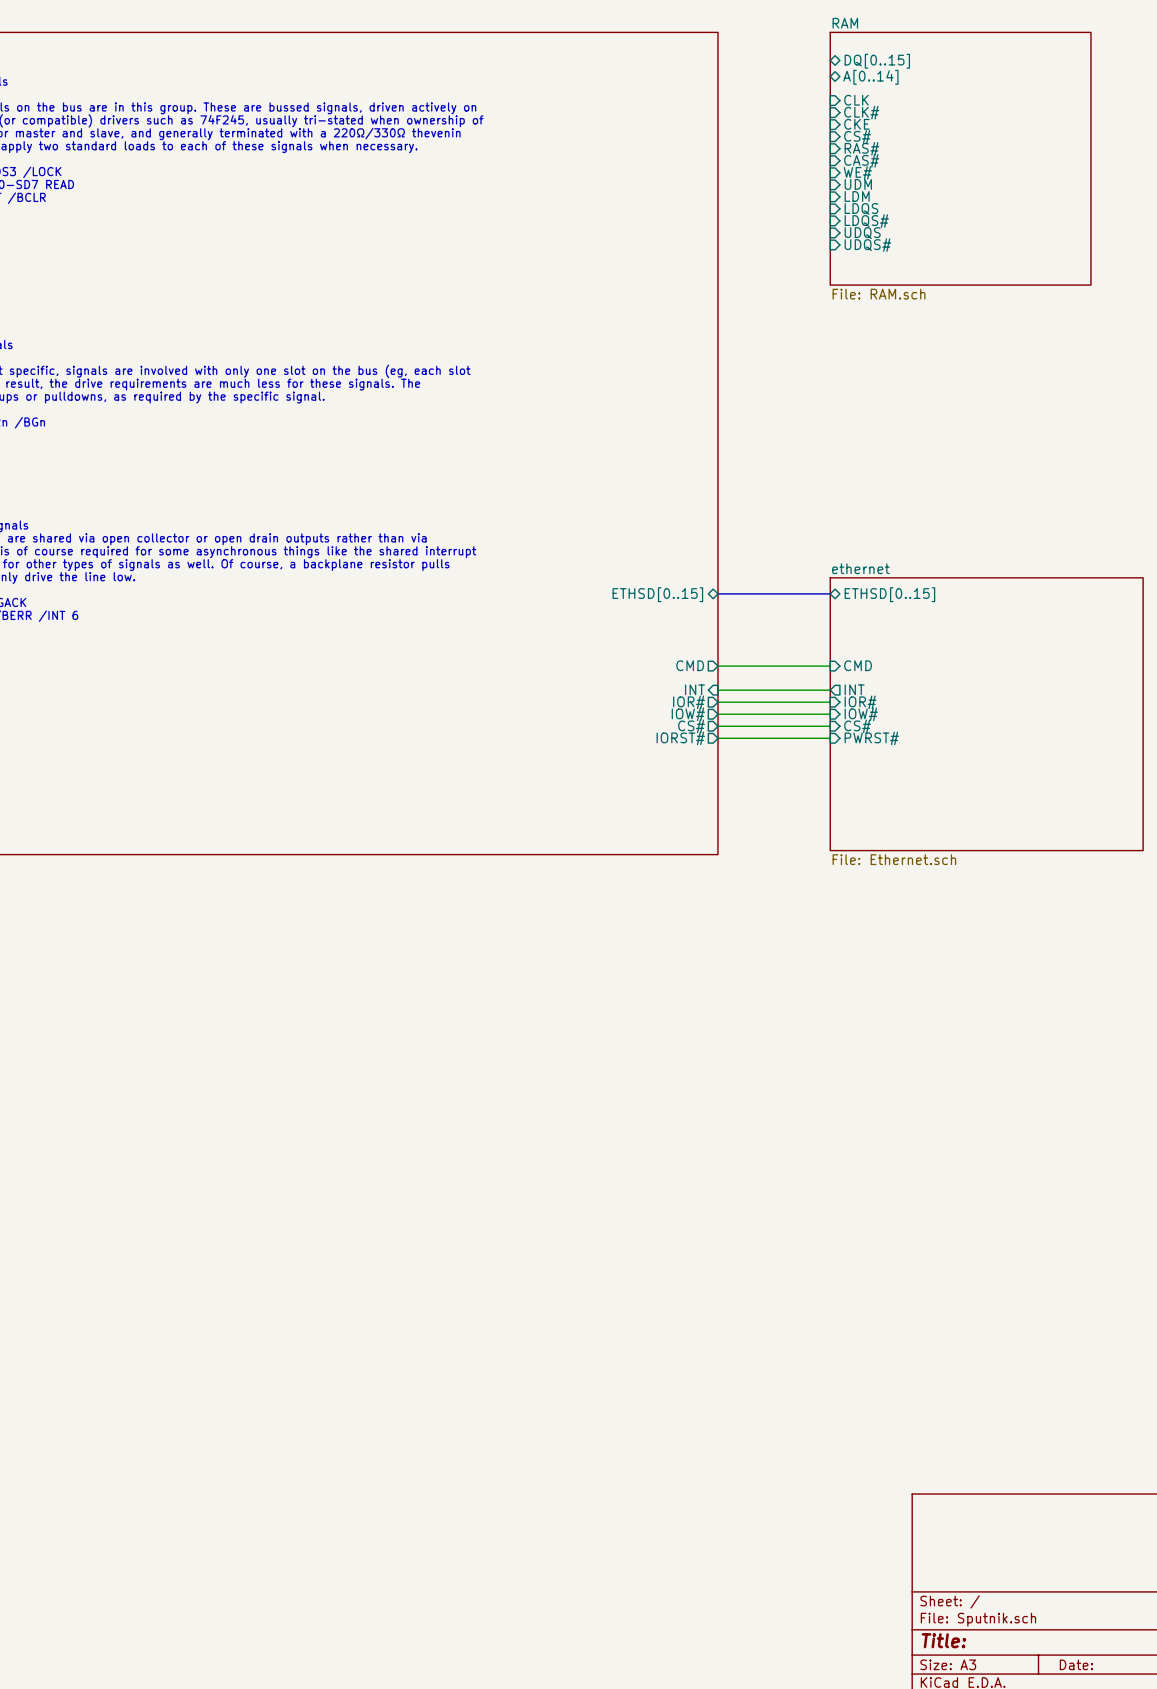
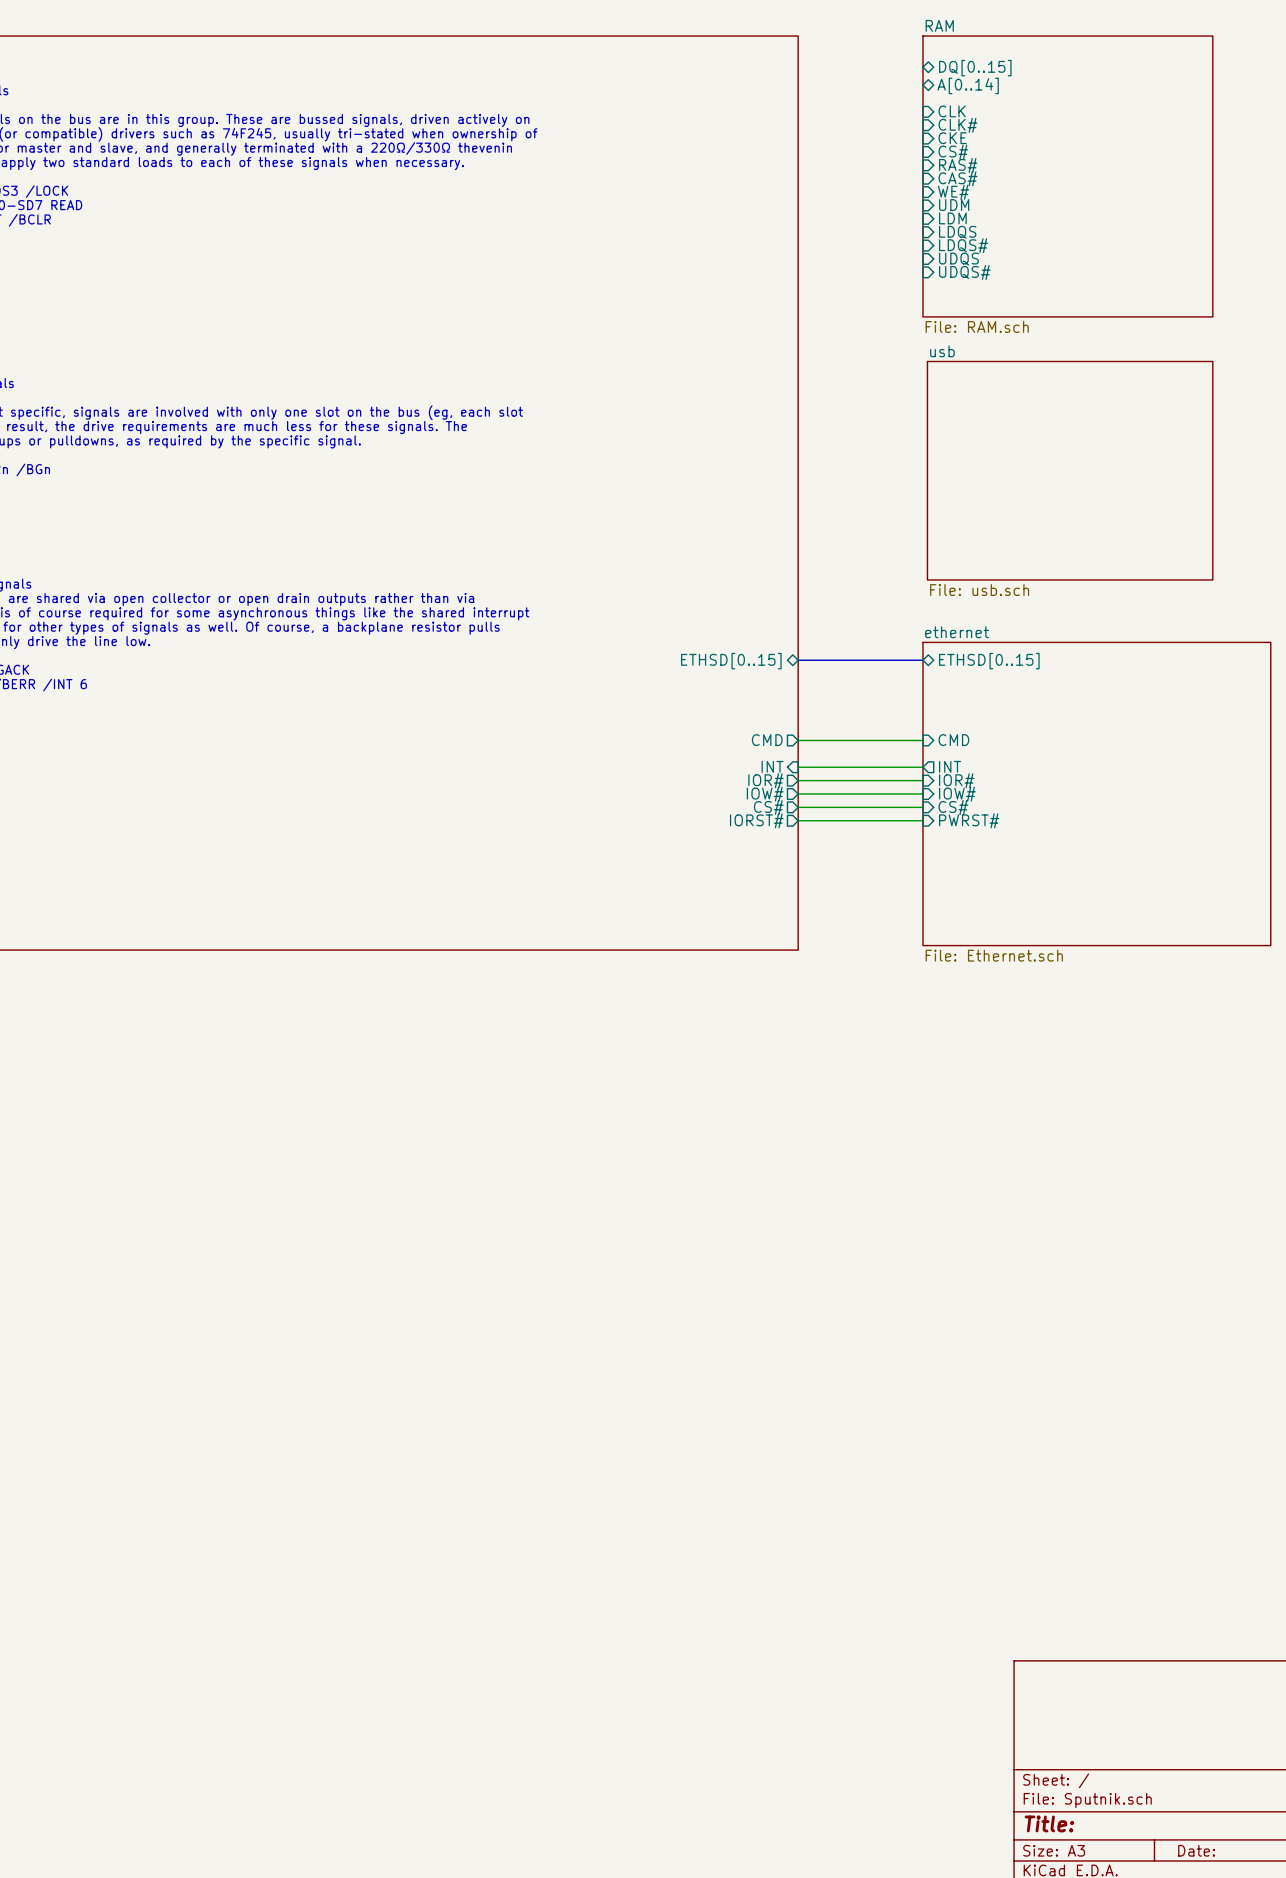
sheet usb: none -> File: usb.sch (1070, 470)

